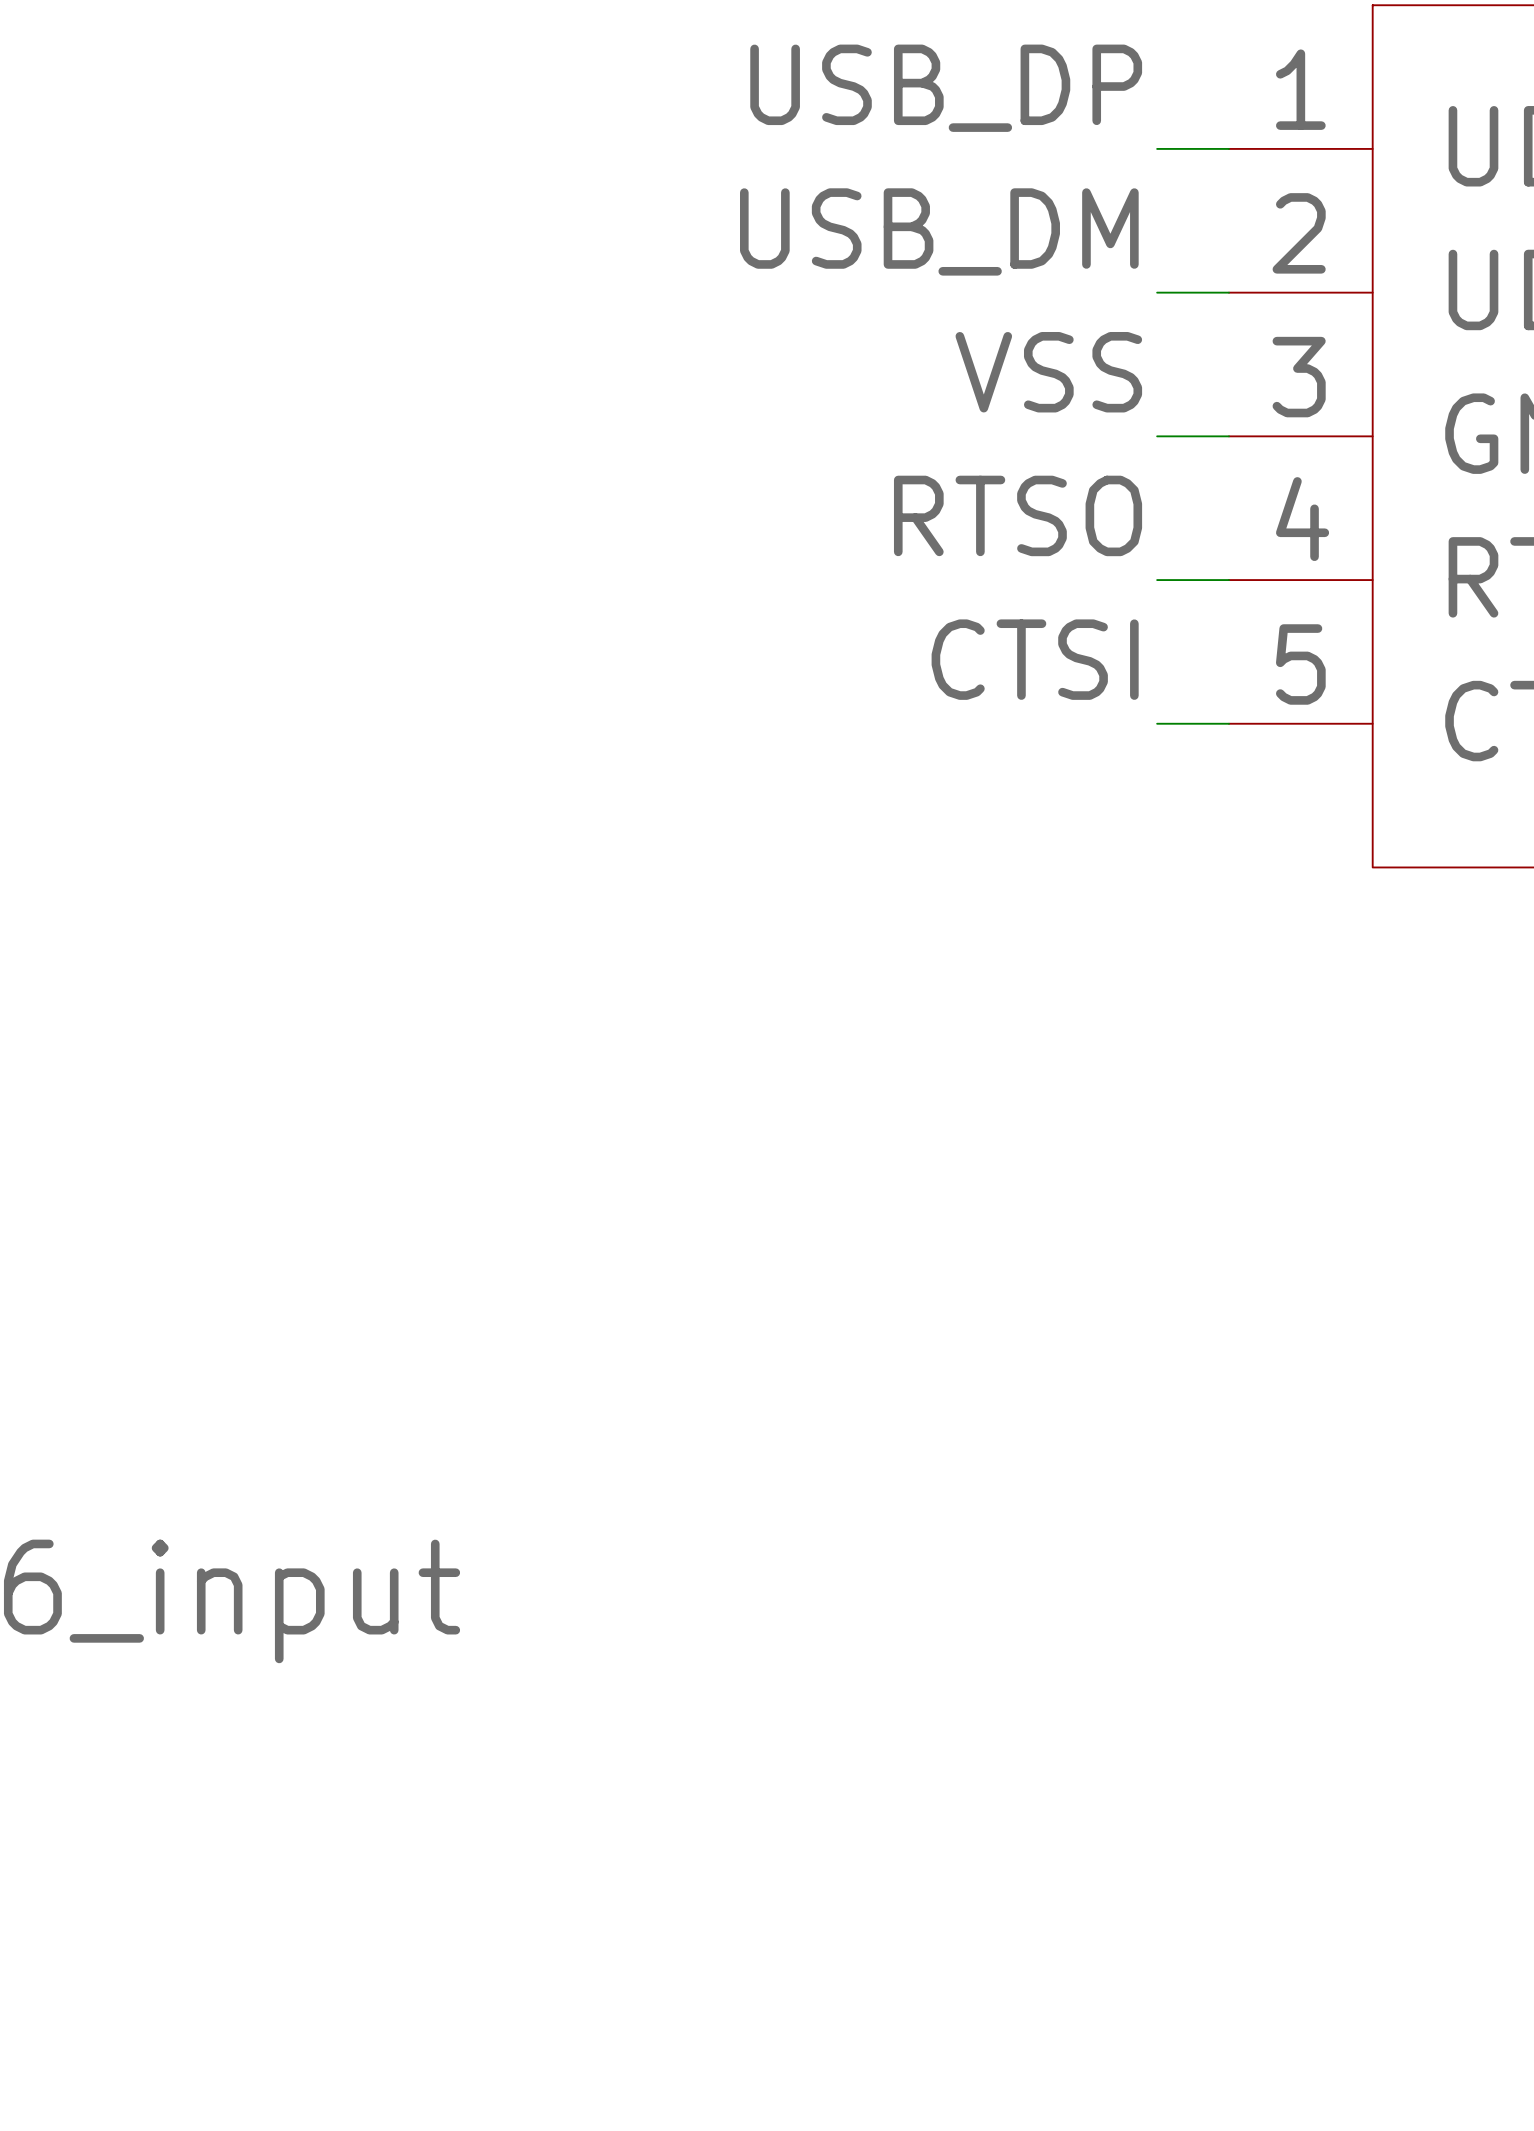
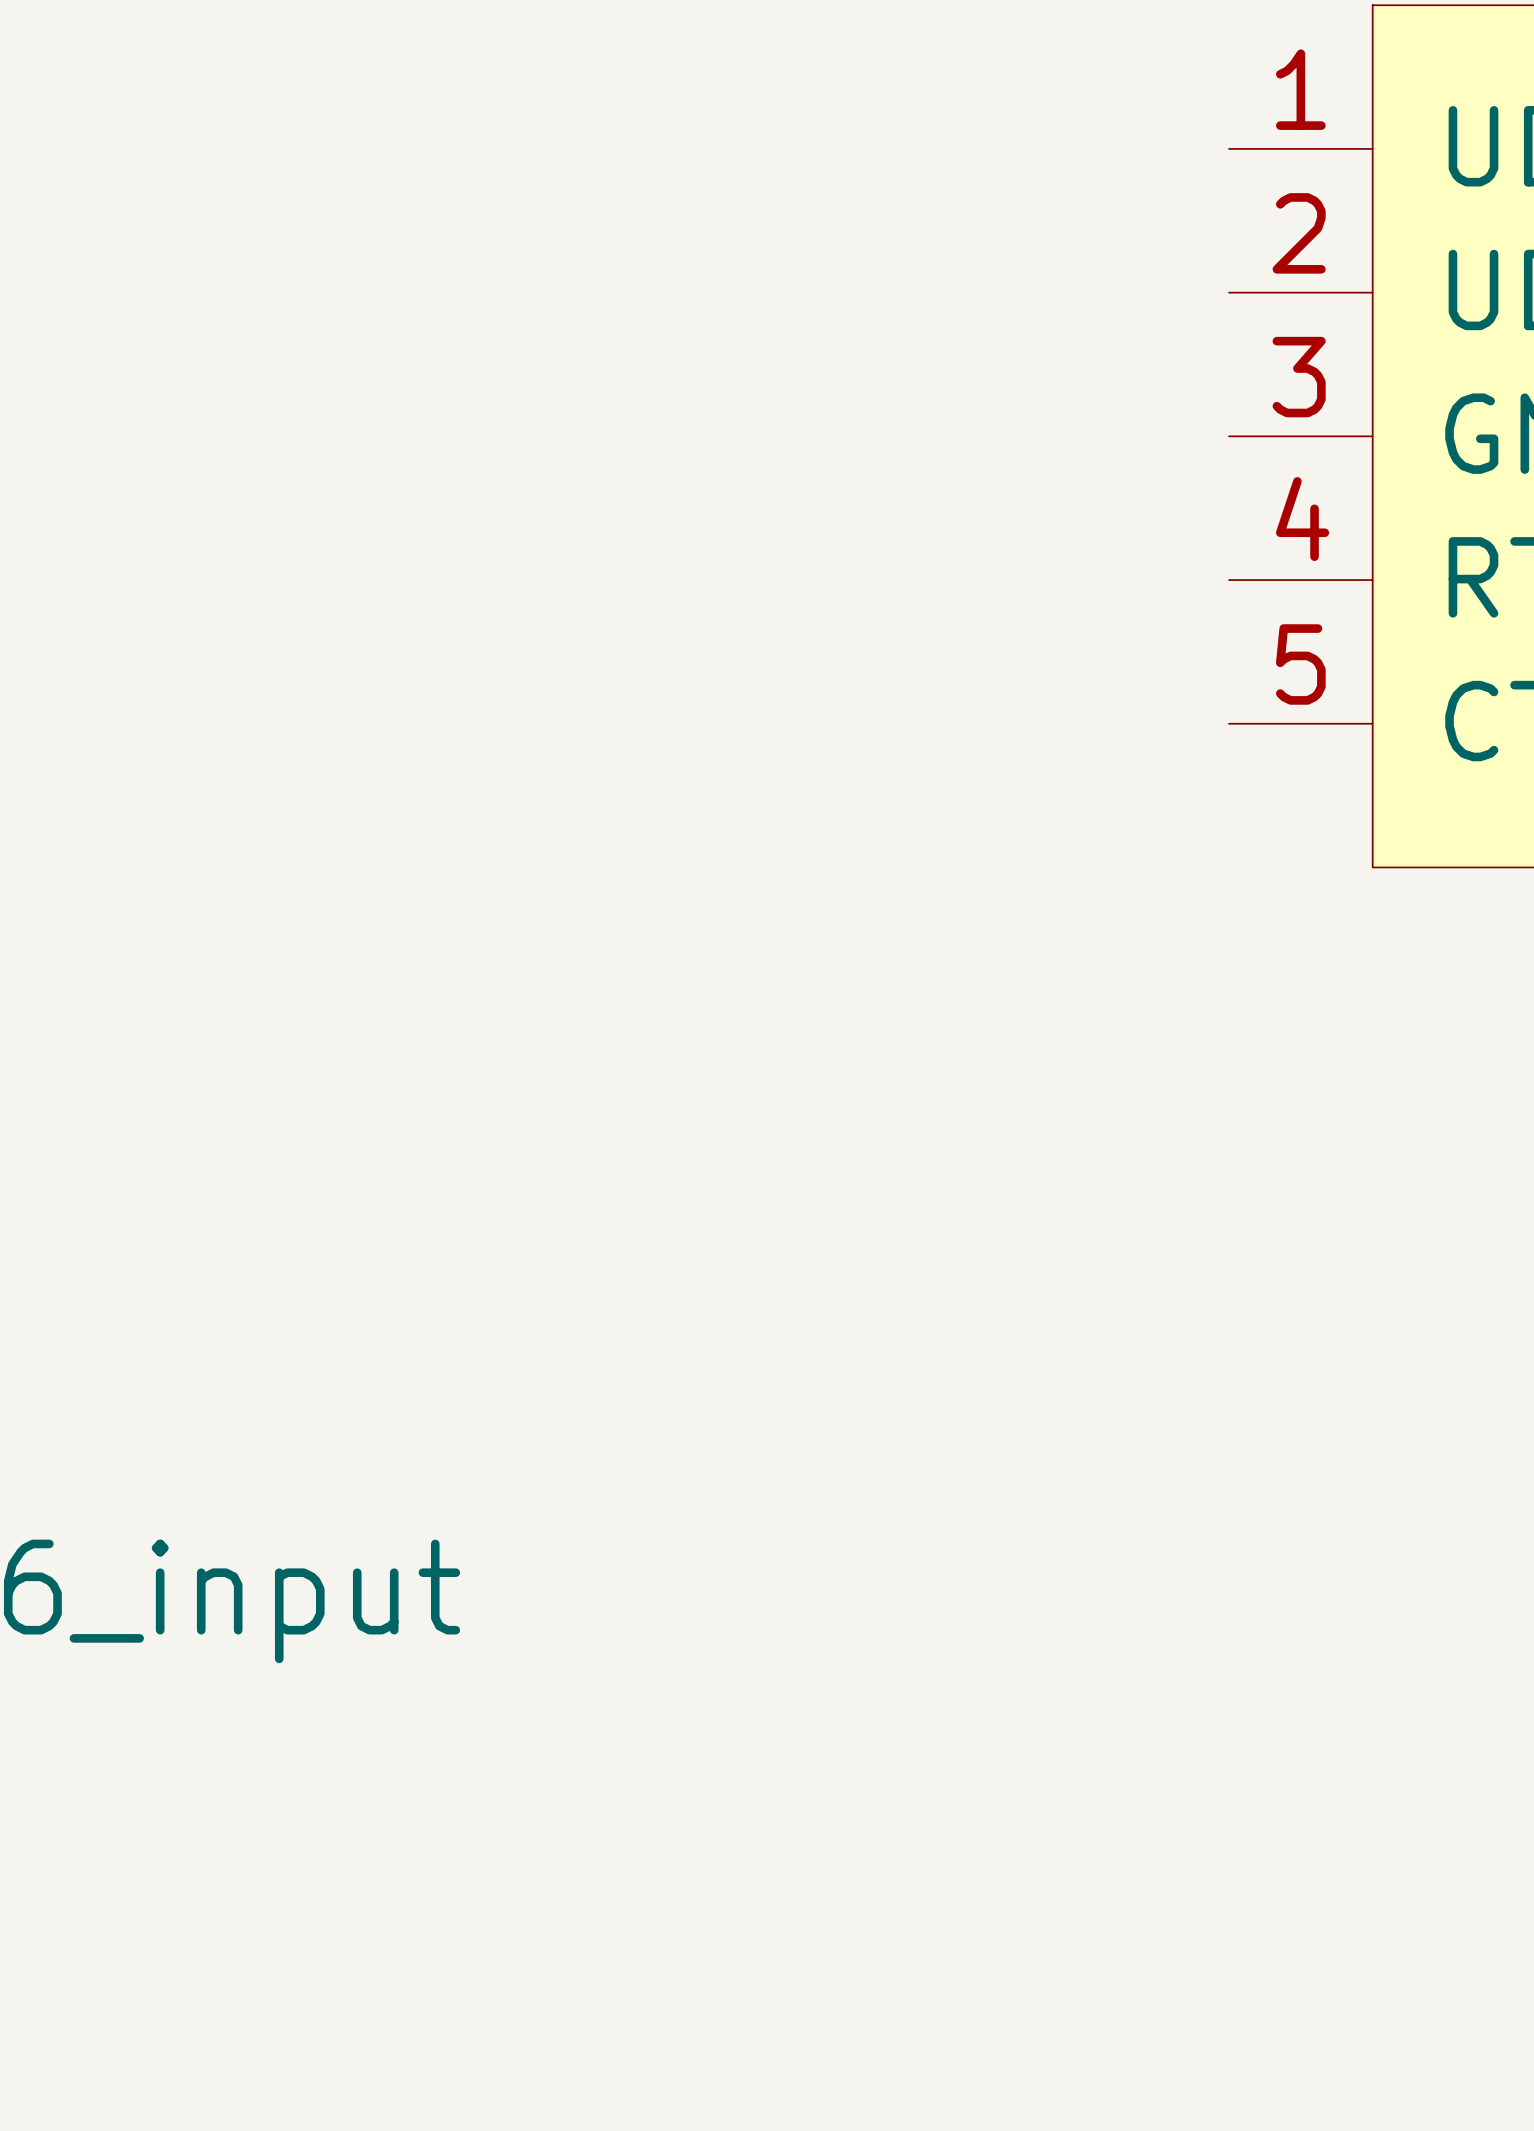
label: USB_DP (946, 88) -> none
wire: (1157, 148) (1228, 148) -> none
label: USB_DM (939, 231) -> none
wire: (1157, 292) (1228, 292) -> none
label: VSS (1048, 372) -> none
wire: (1157, 436) (1228, 436) -> none
label: RTSO (1018, 515) -> none
wire: (1157, 580) (1228, 580) -> none
label: CTSI (1035, 659) -> none
wire: (1157, 723) (1228, 723) -> none

